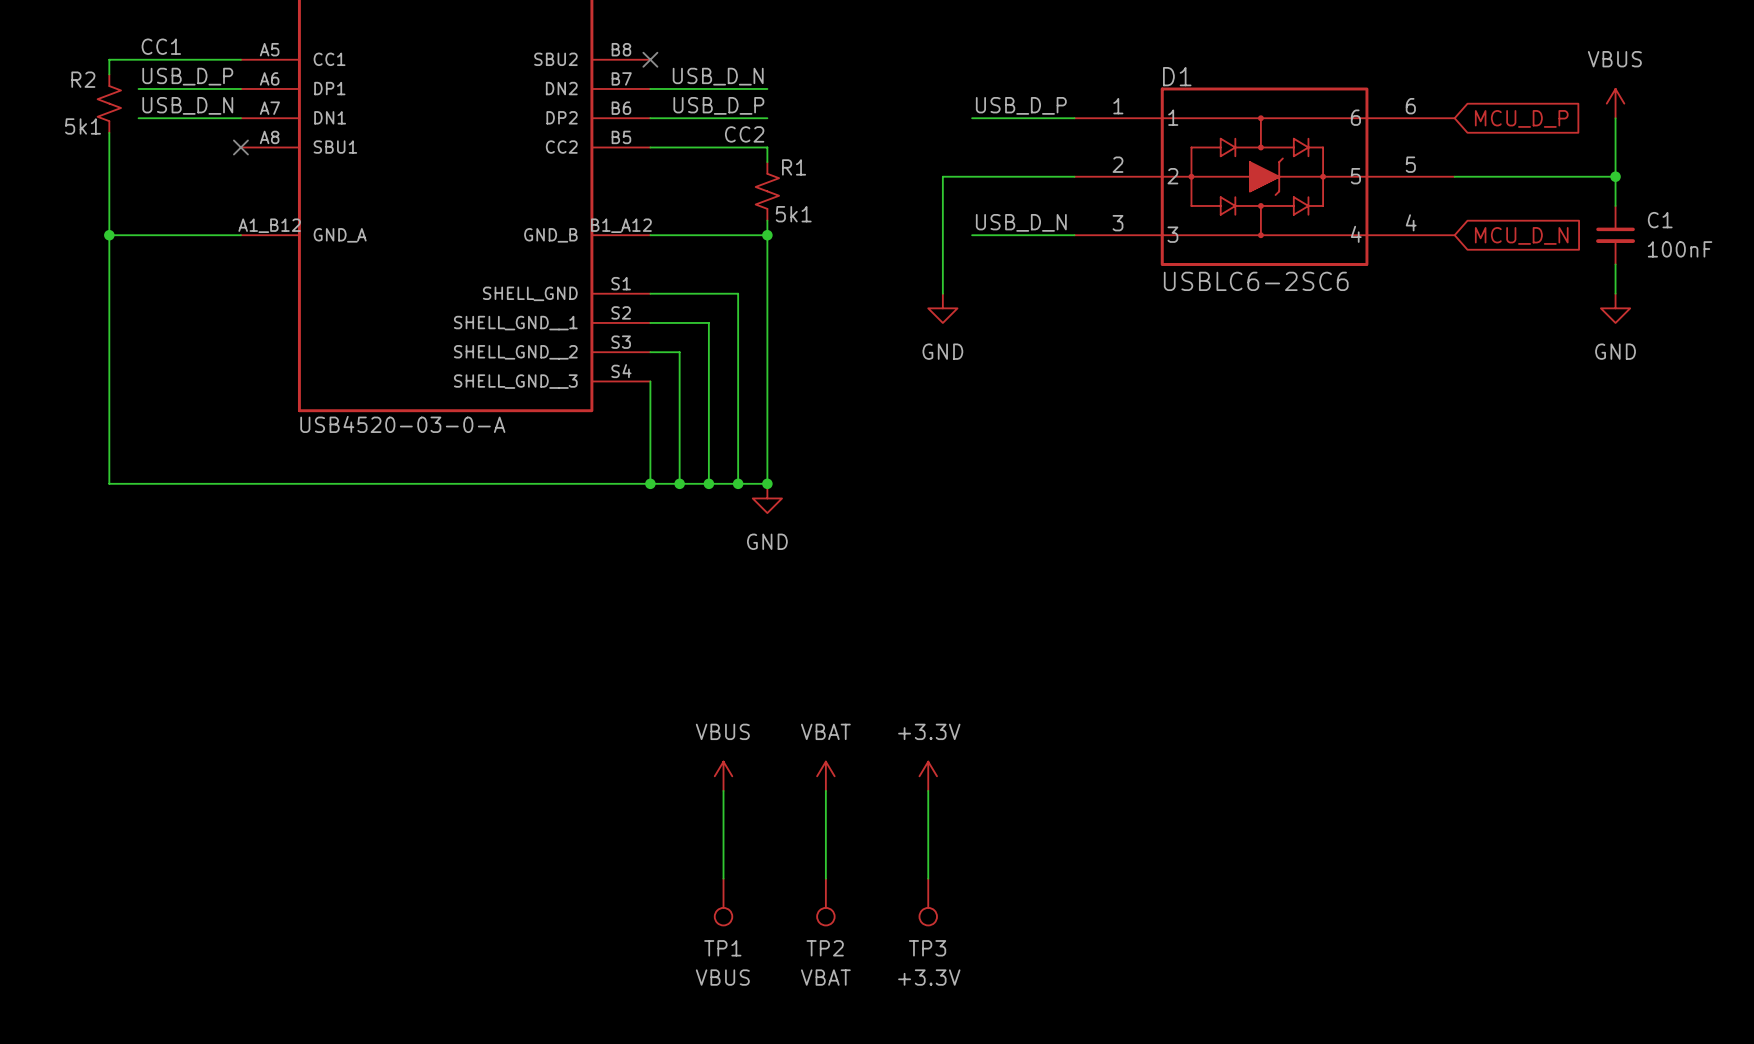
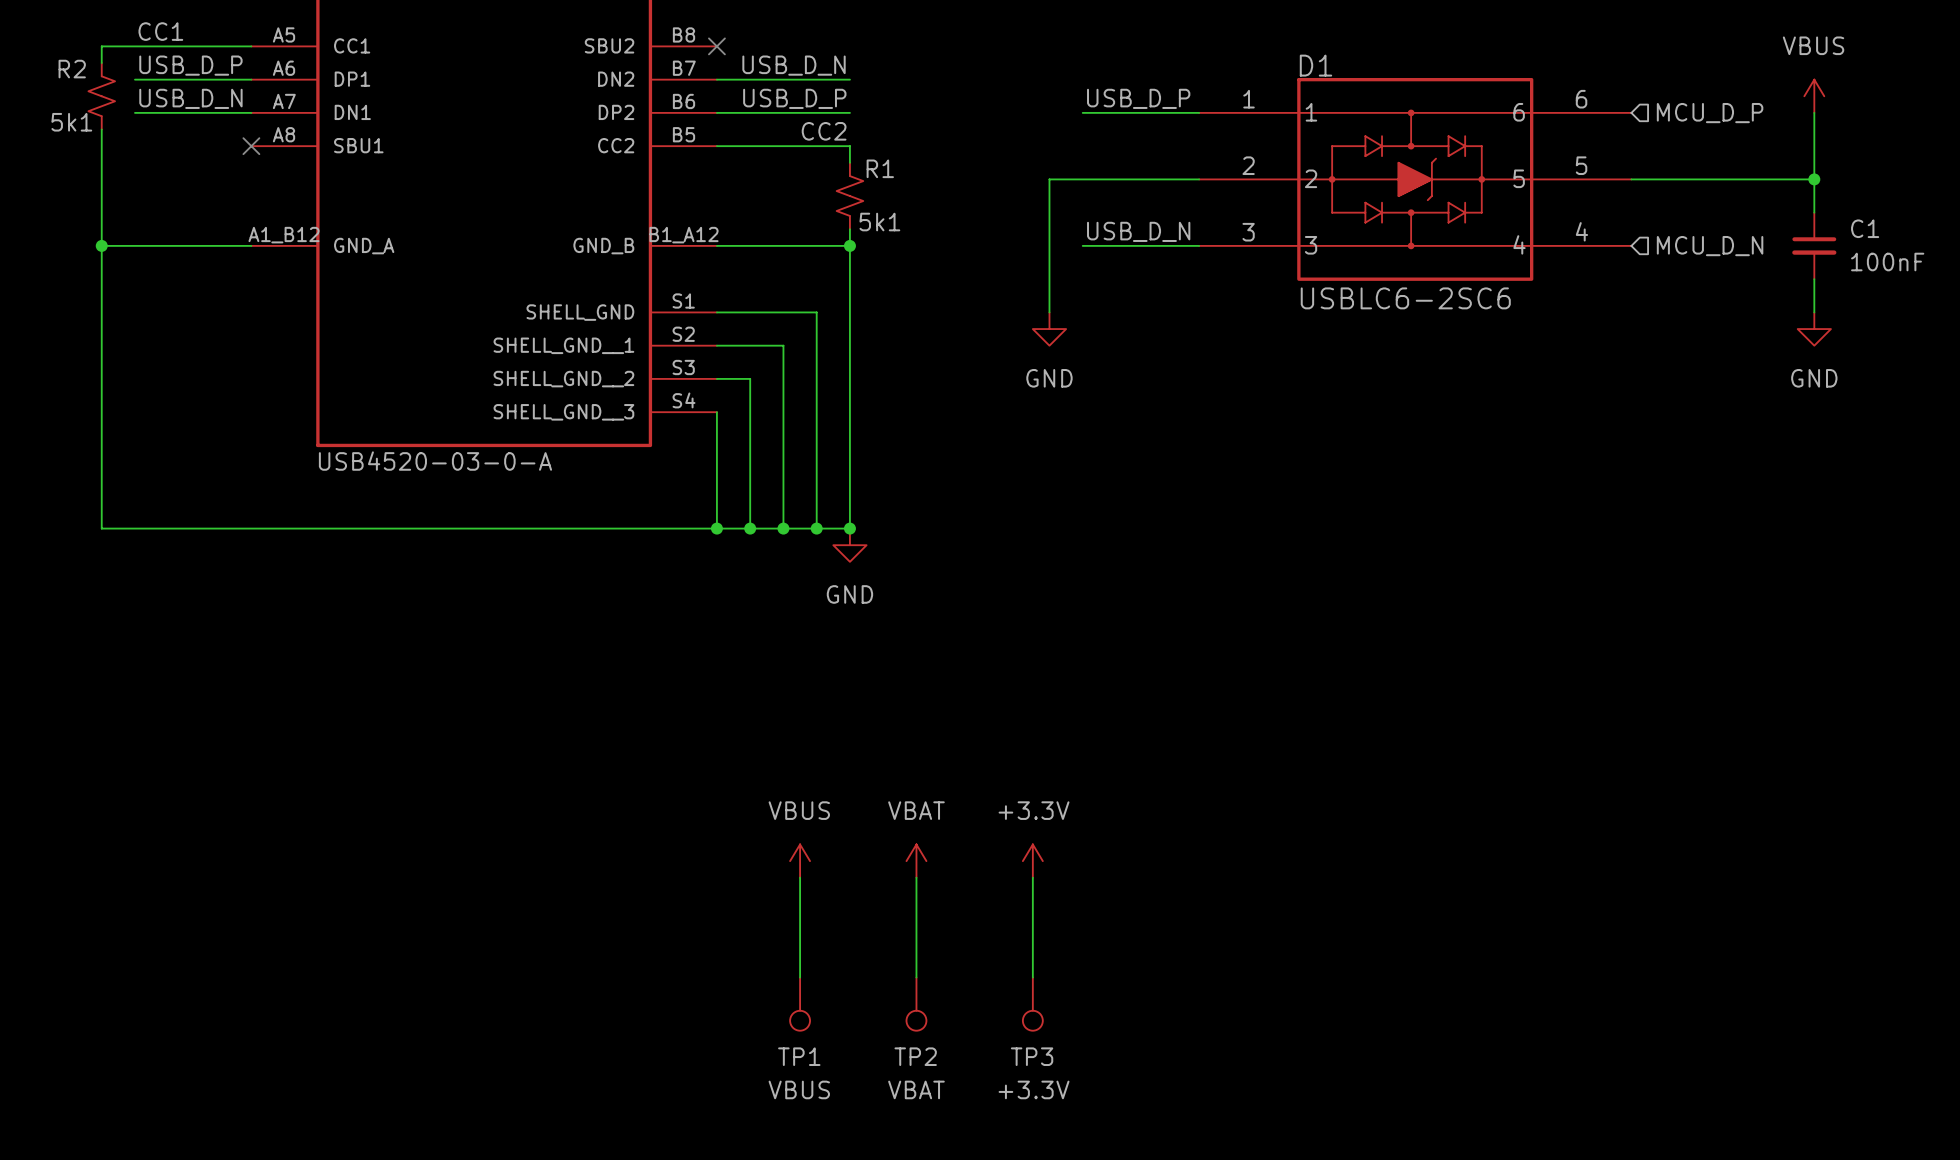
global label: MCU_D_P (1521, 118) -> none
hierarchical label: none -> MCU_D_P (1710, 113)
global label: MCU_D_N (1521, 235) -> none
hierarchical label: none -> MCU_D_N (1710, 246)

